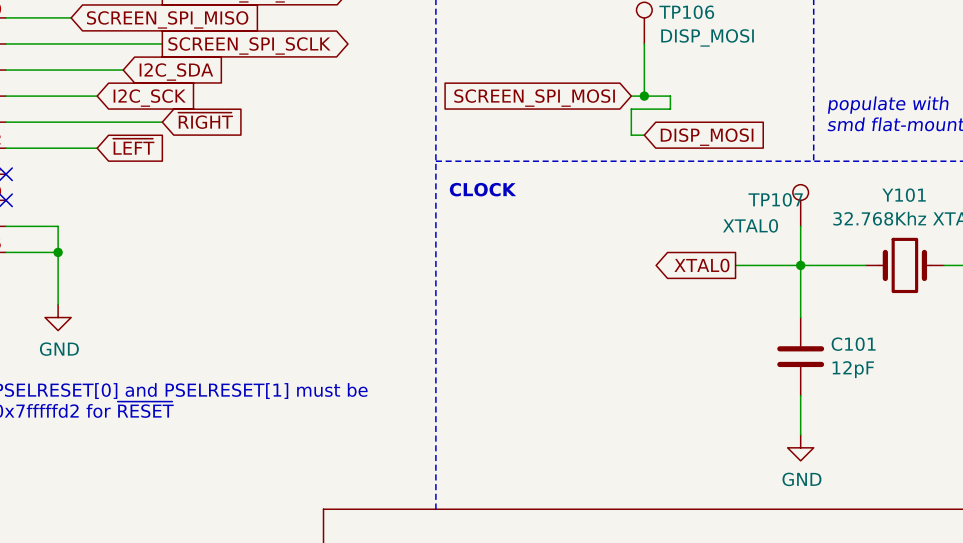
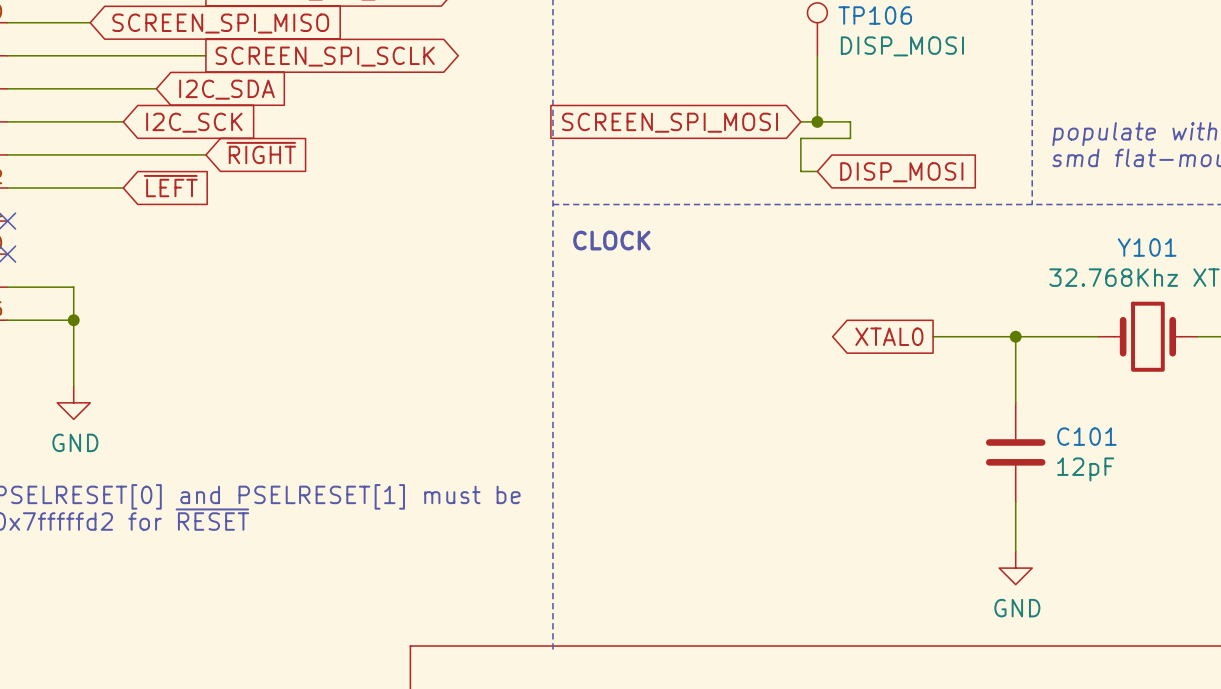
TP107: XTAL0 (800, 205) -> none
wire: (800, 226) (800, 265) -> none

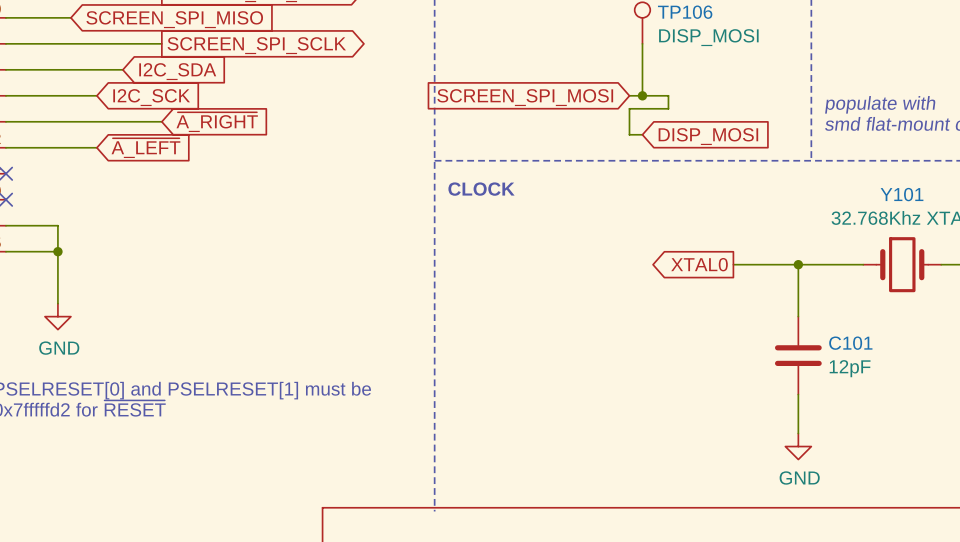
global label: ~{RIGHT} (261, 153) -> ~{A_RIGHT} (217, 122)
global label: ~{LEFT} (170, 186) -> ~{A_LEFT} (145, 148)

